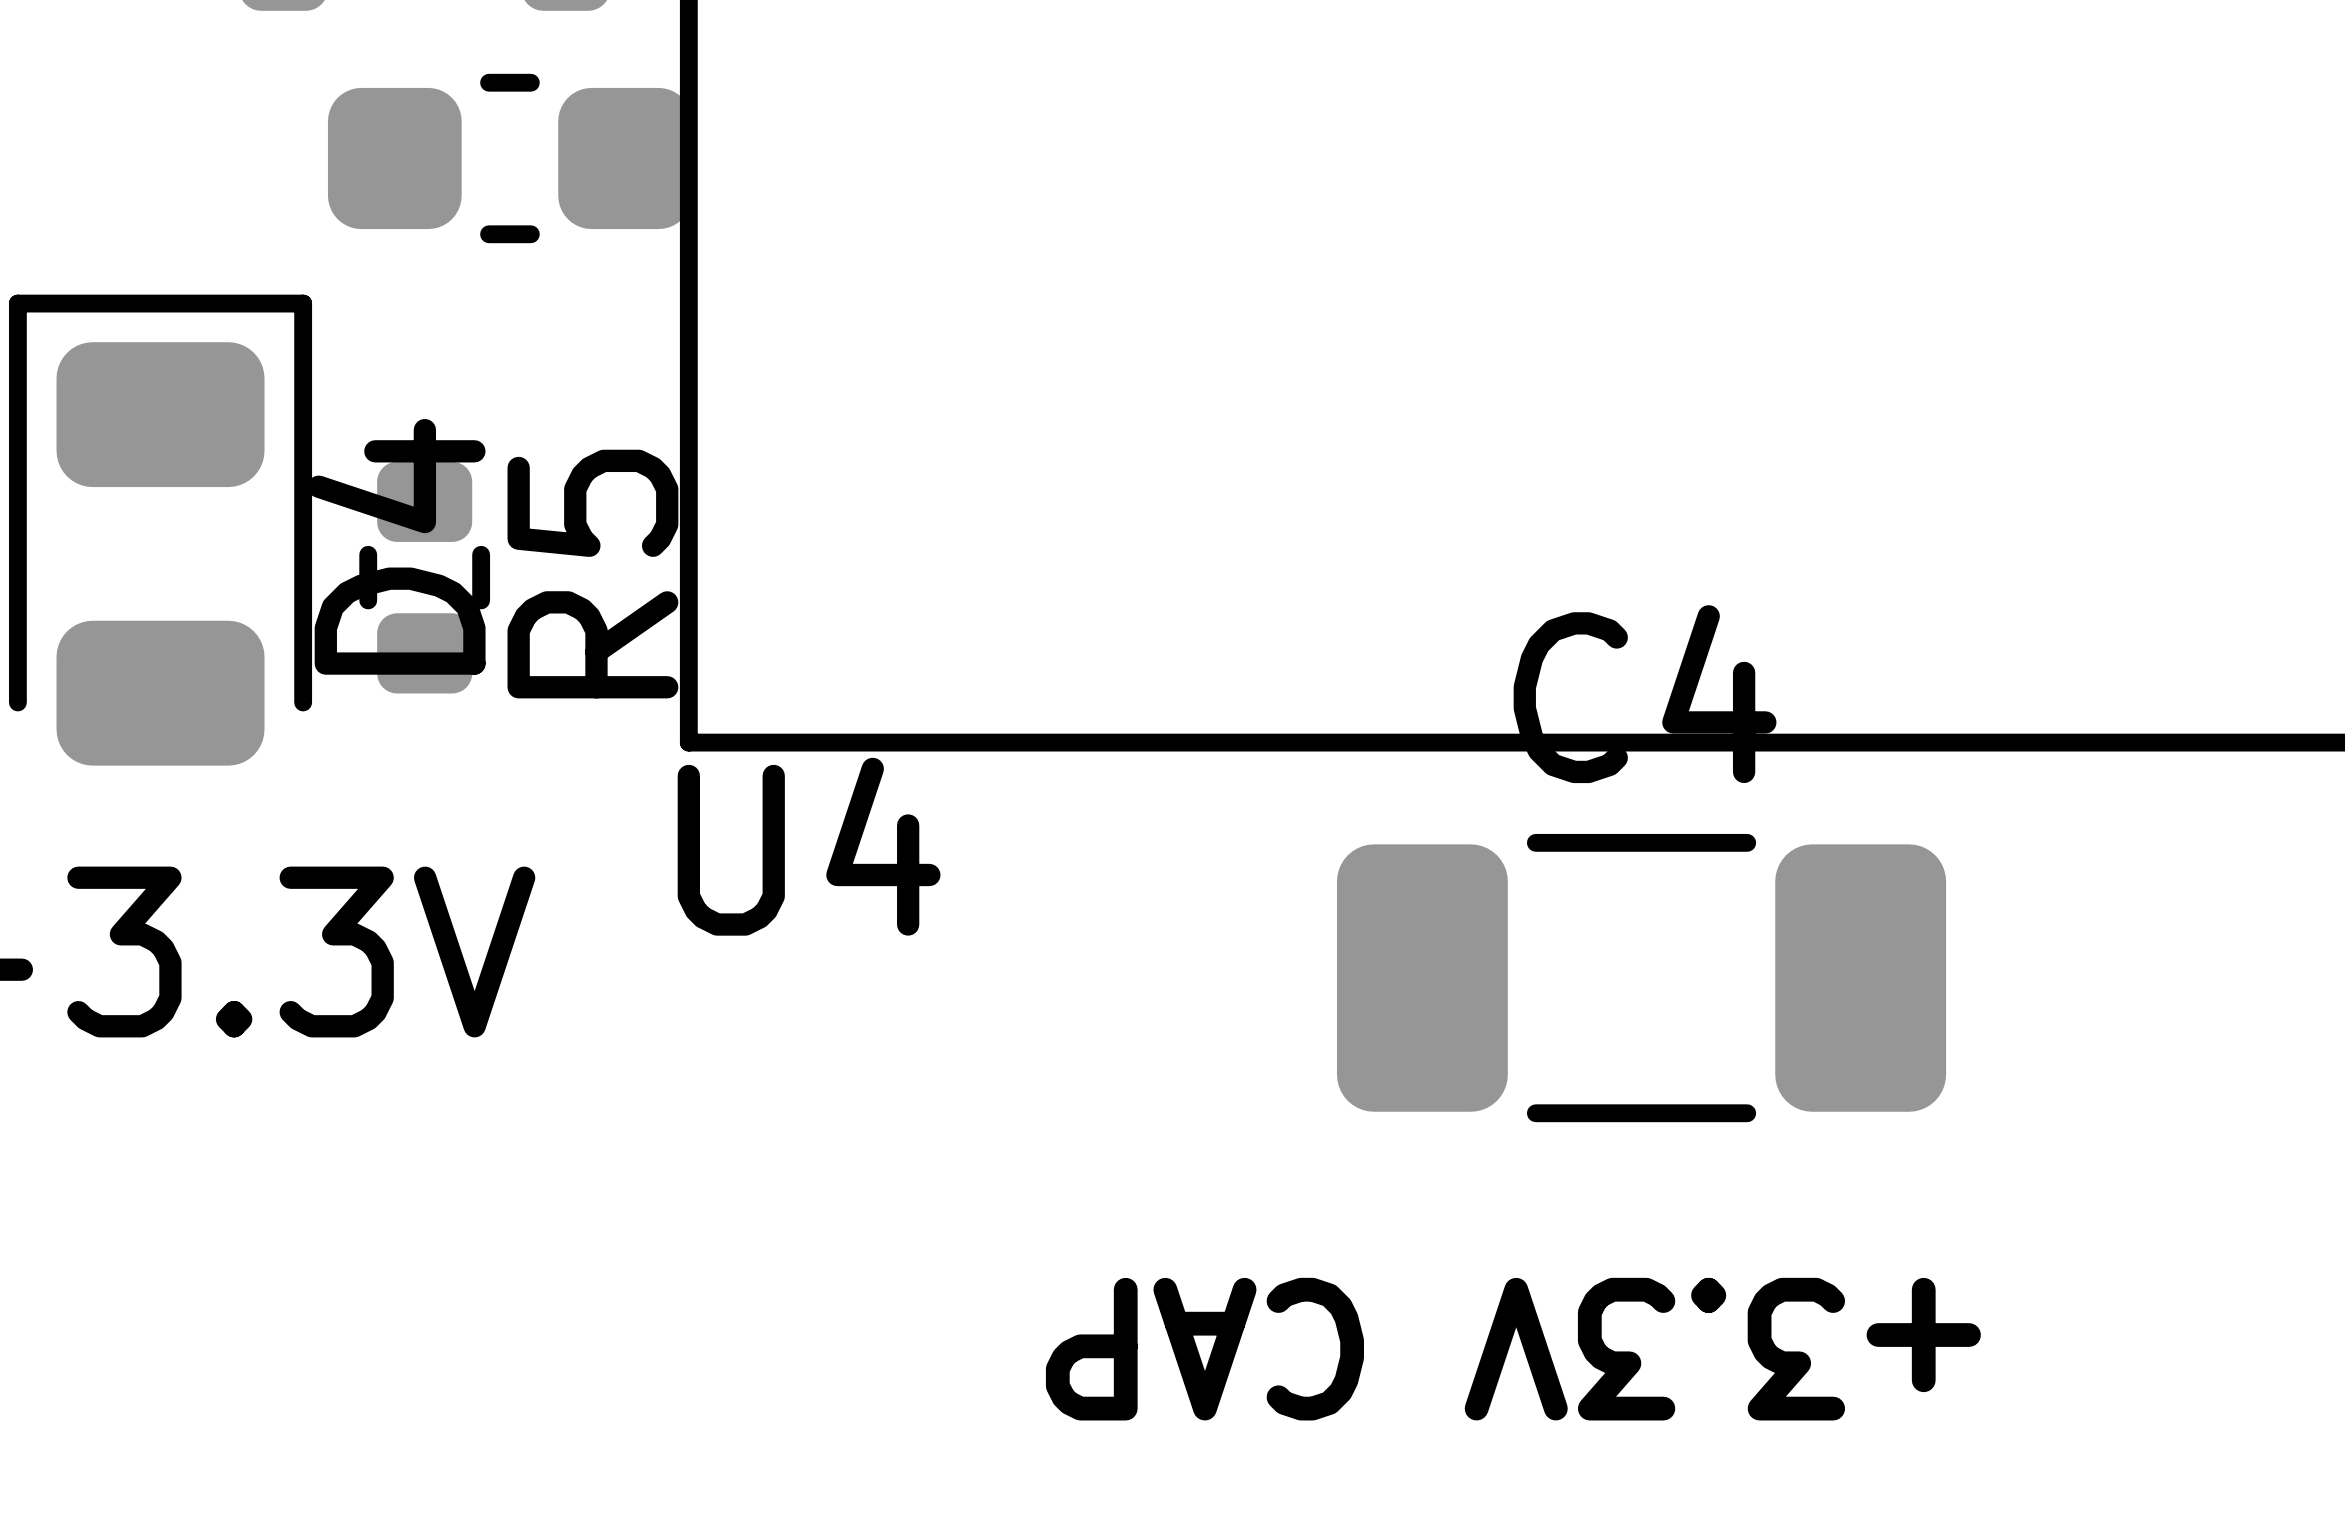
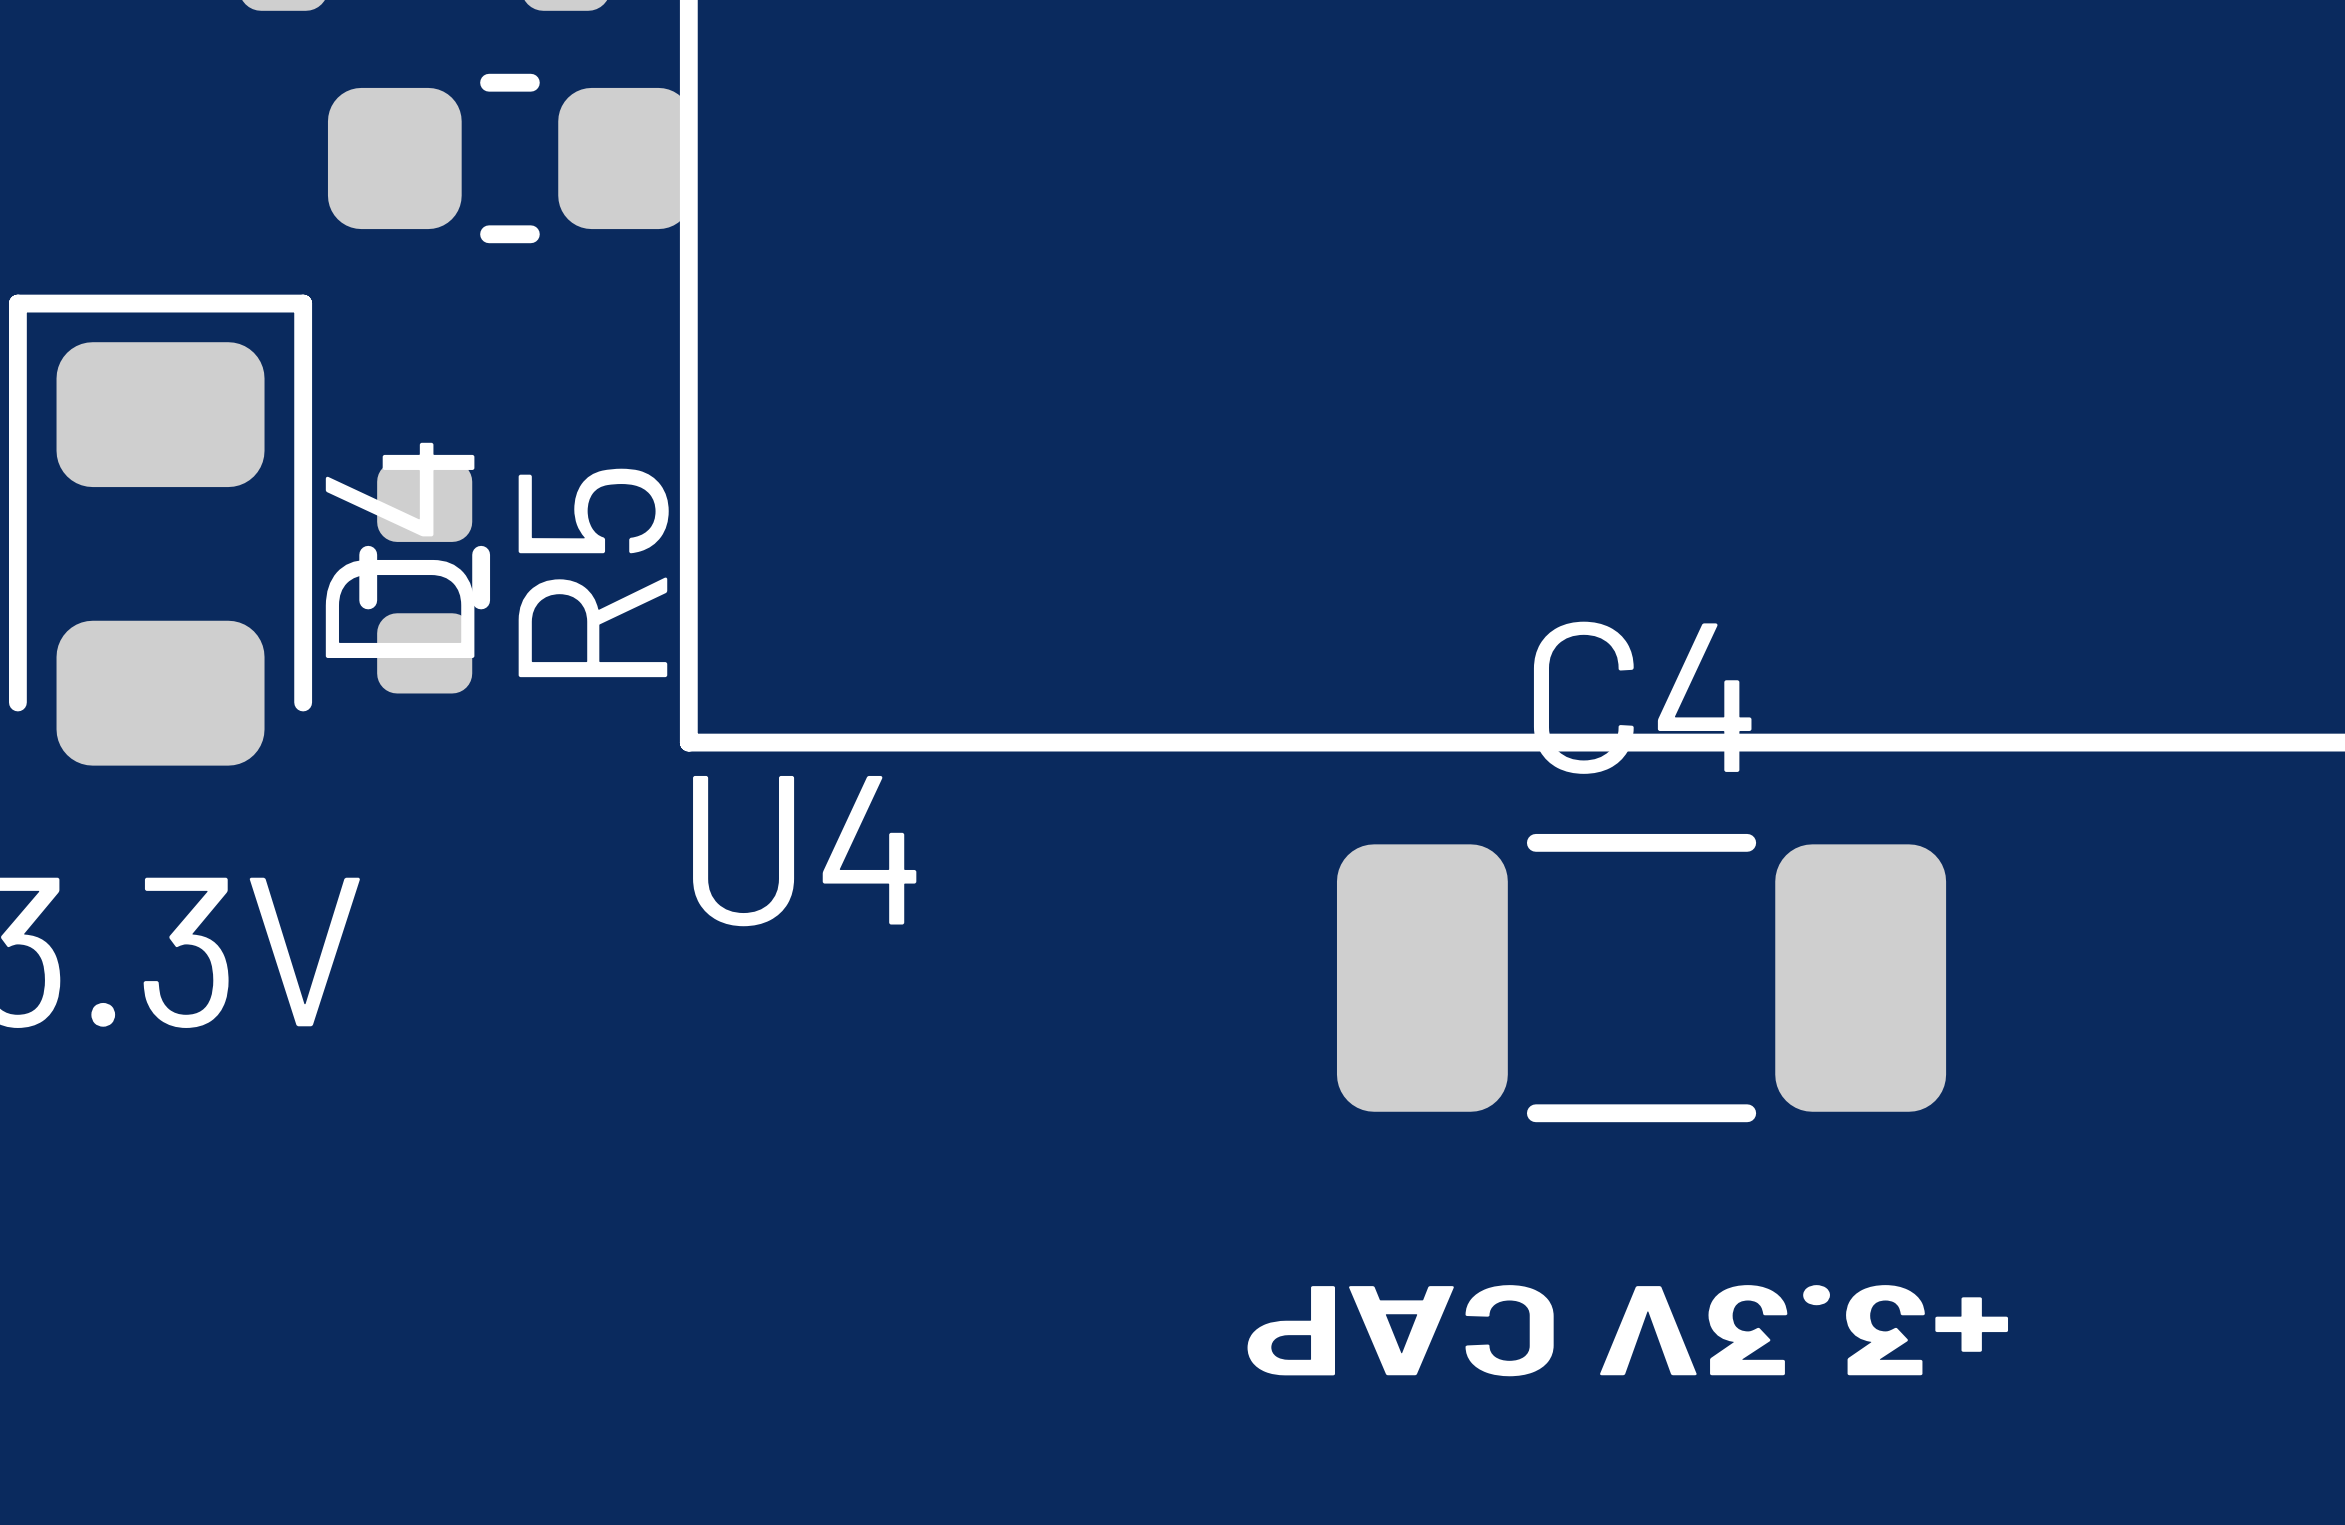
text position: +3.3V CAP (1513, 1349) -> +3.3V CAP (1627, 1330)

